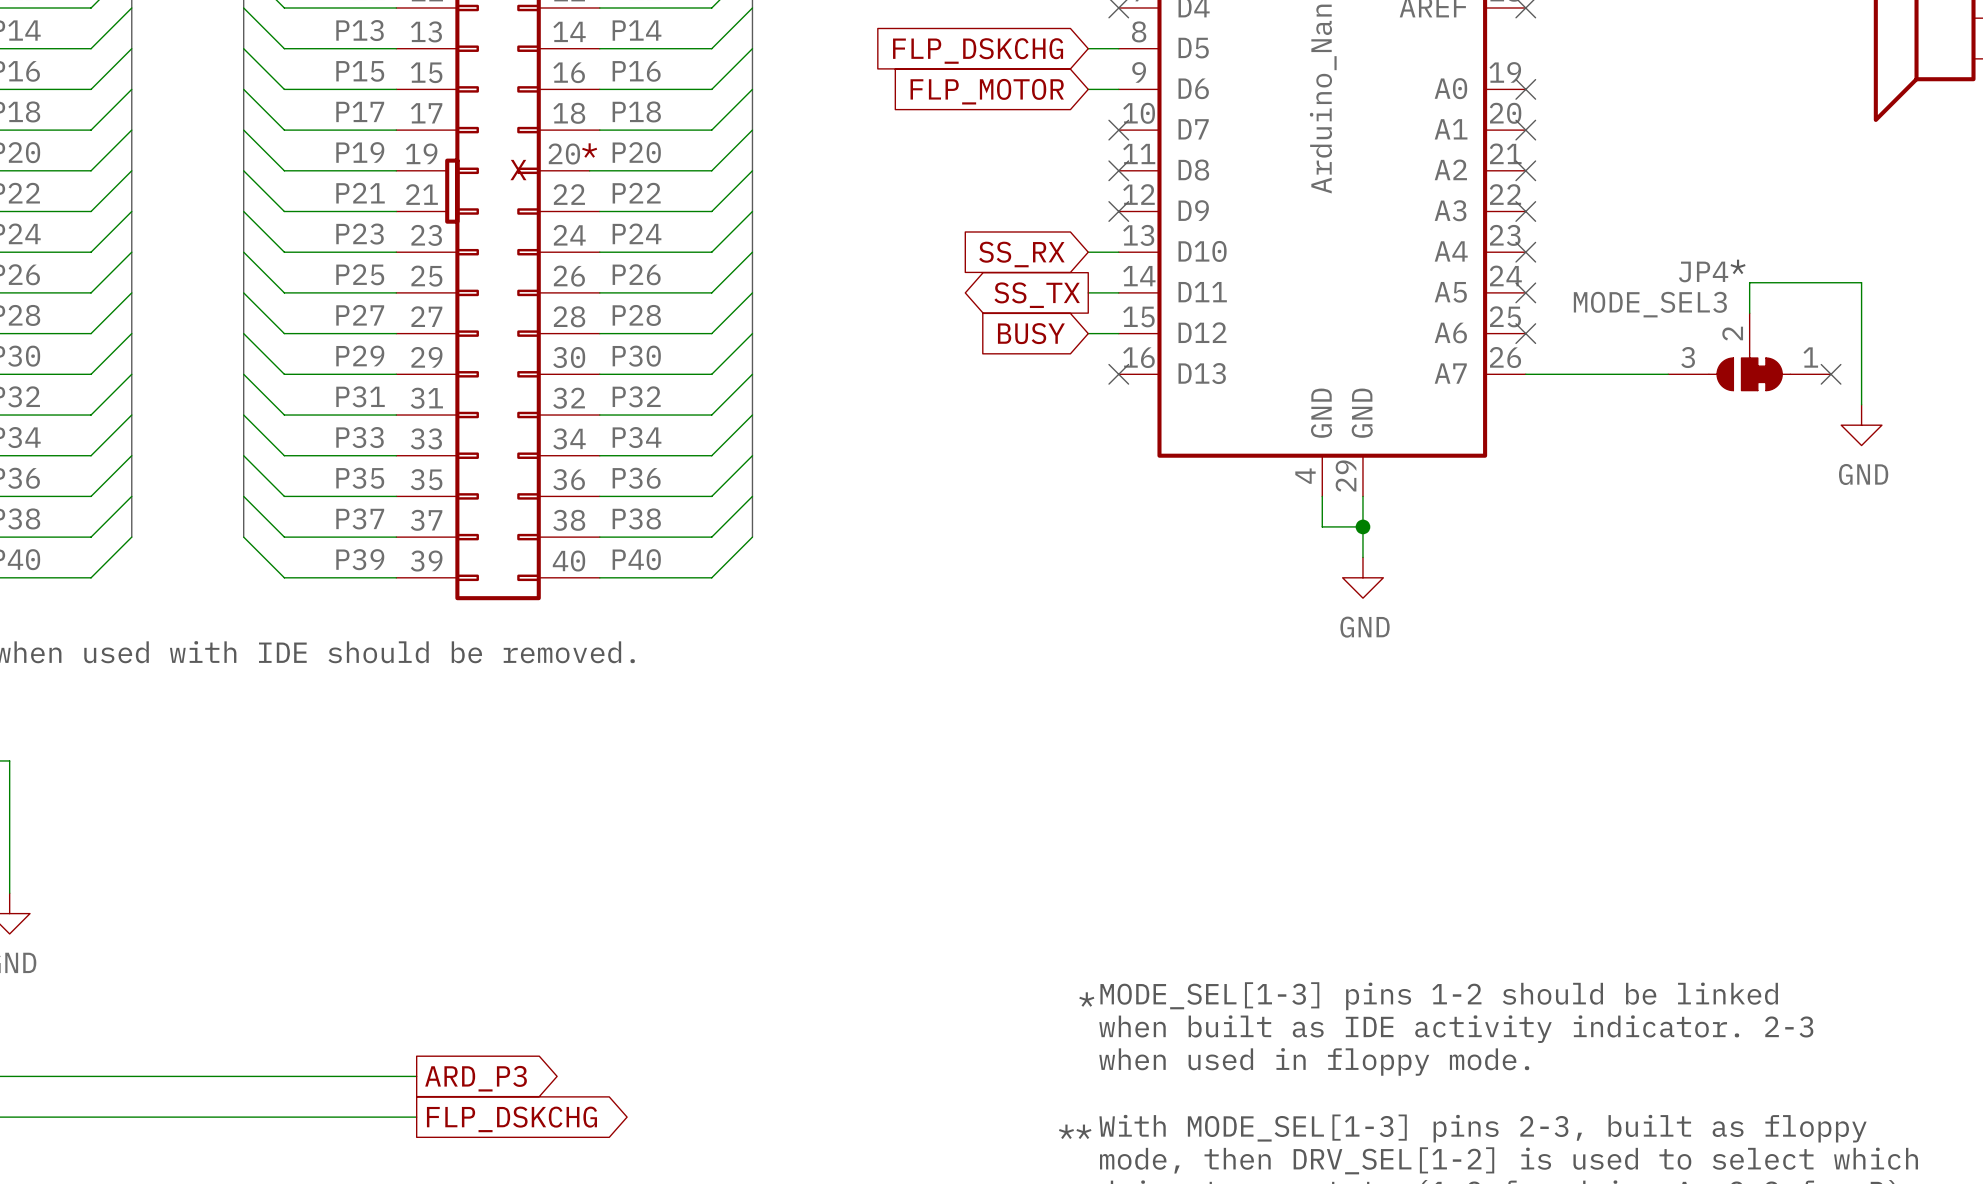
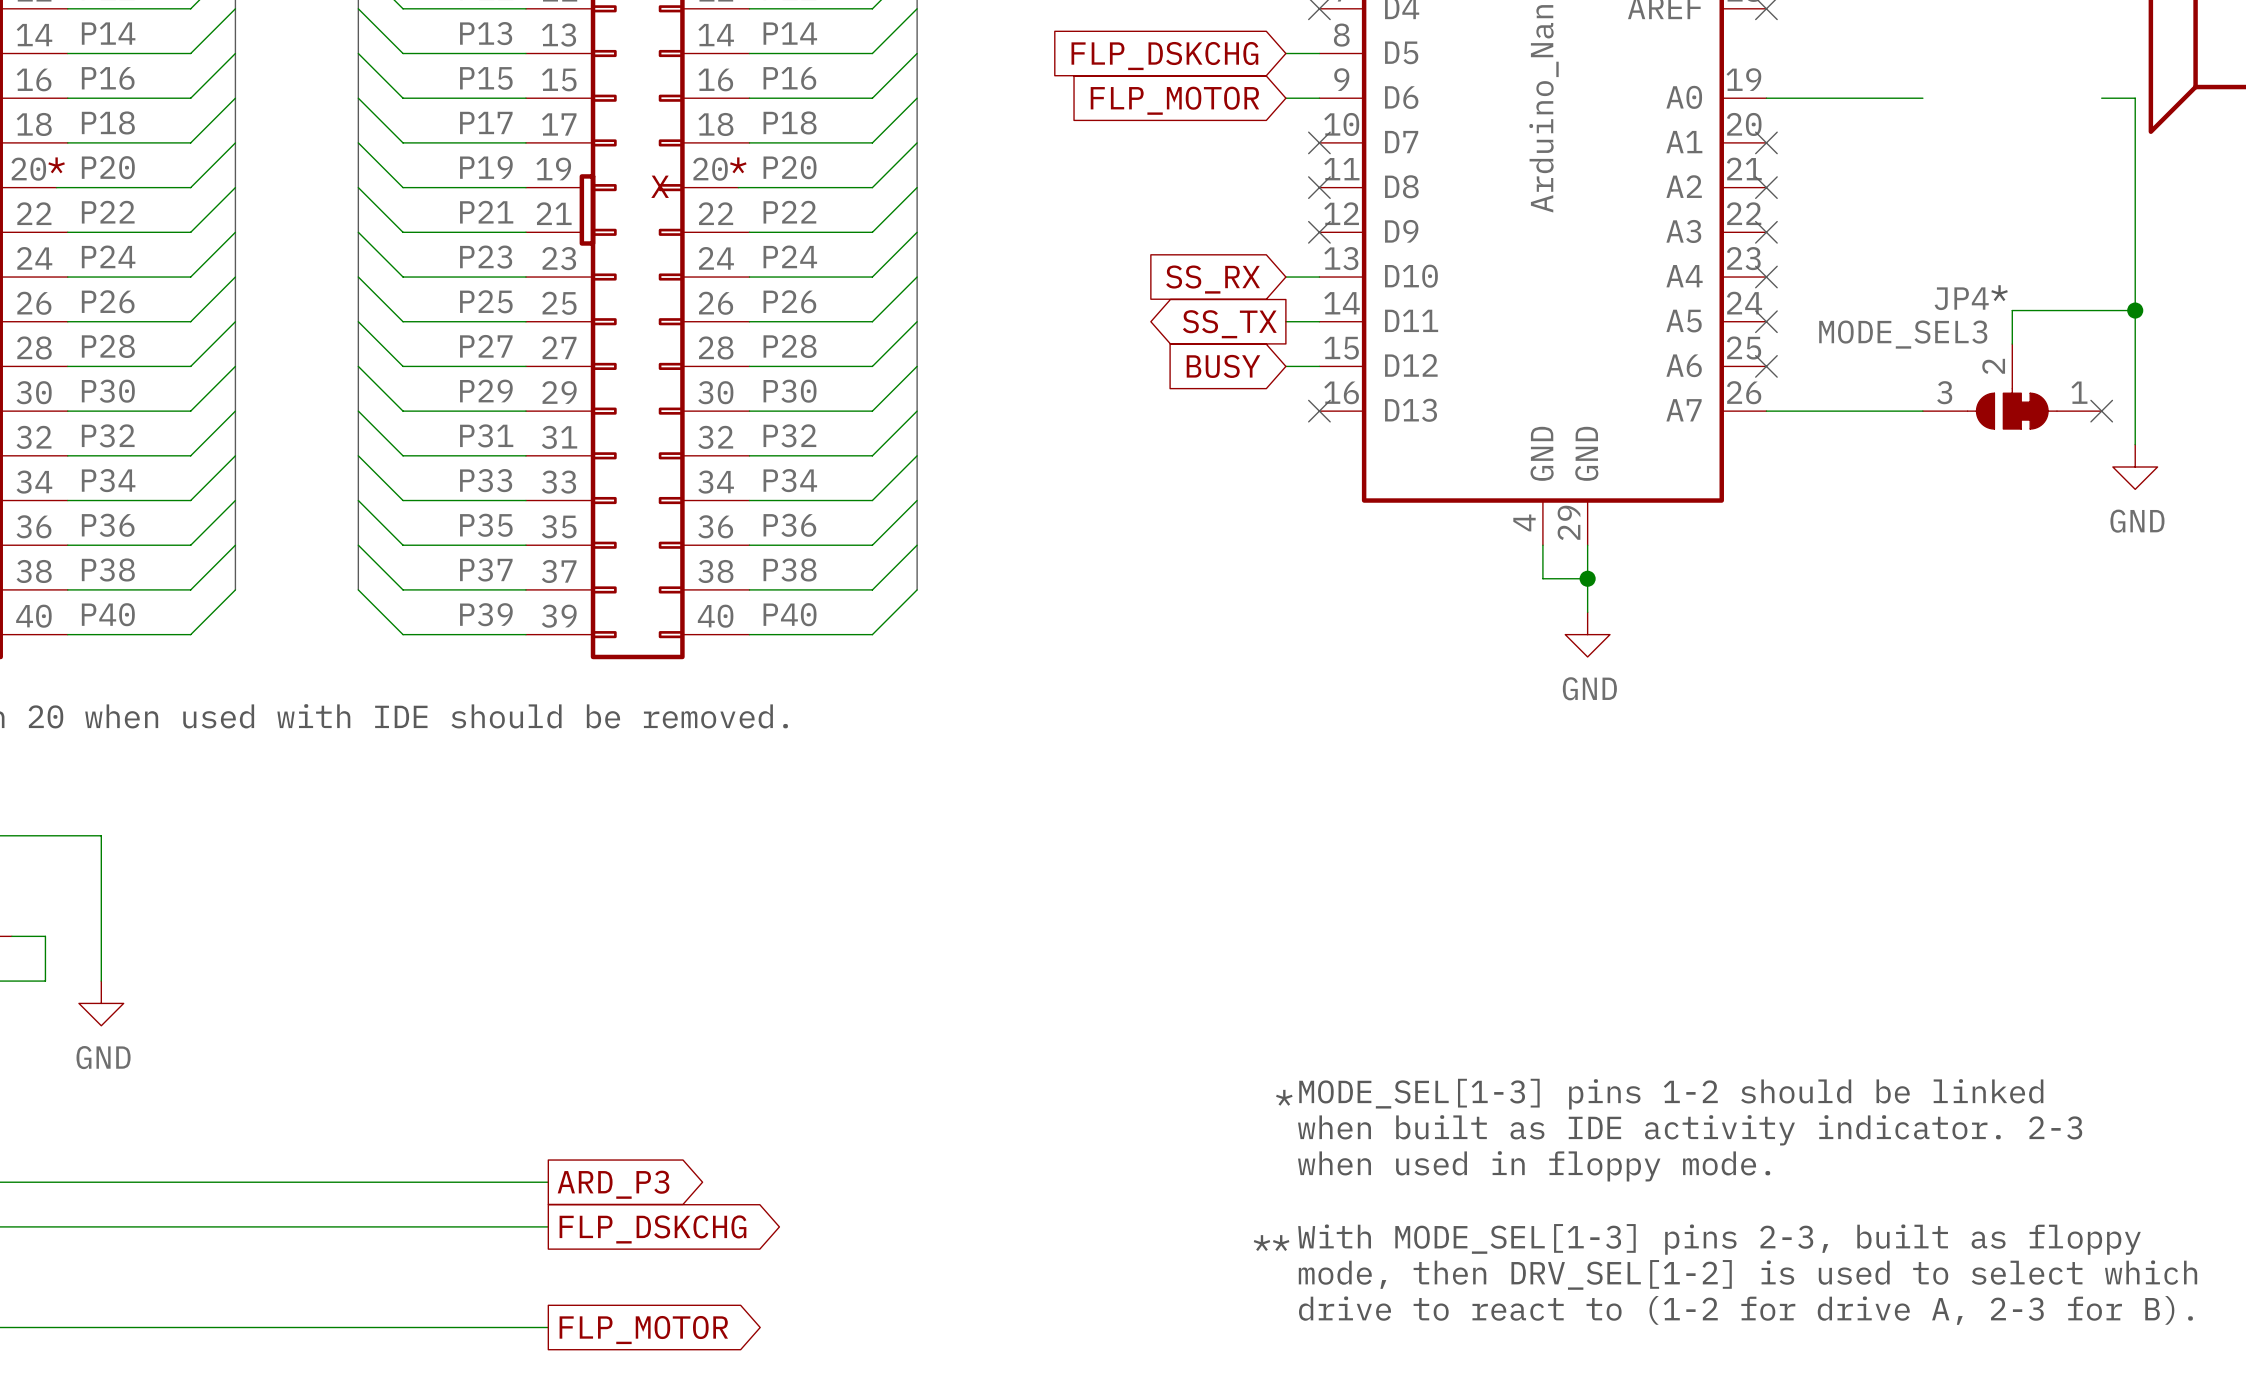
wire: none -> (1766, 98) (1922, 98)
no-connect mark: (1525, 89) -> none
wire: none -> (2101, 98) (2135, 98) (2135, 310)
junction: none -> (2135, 310)

